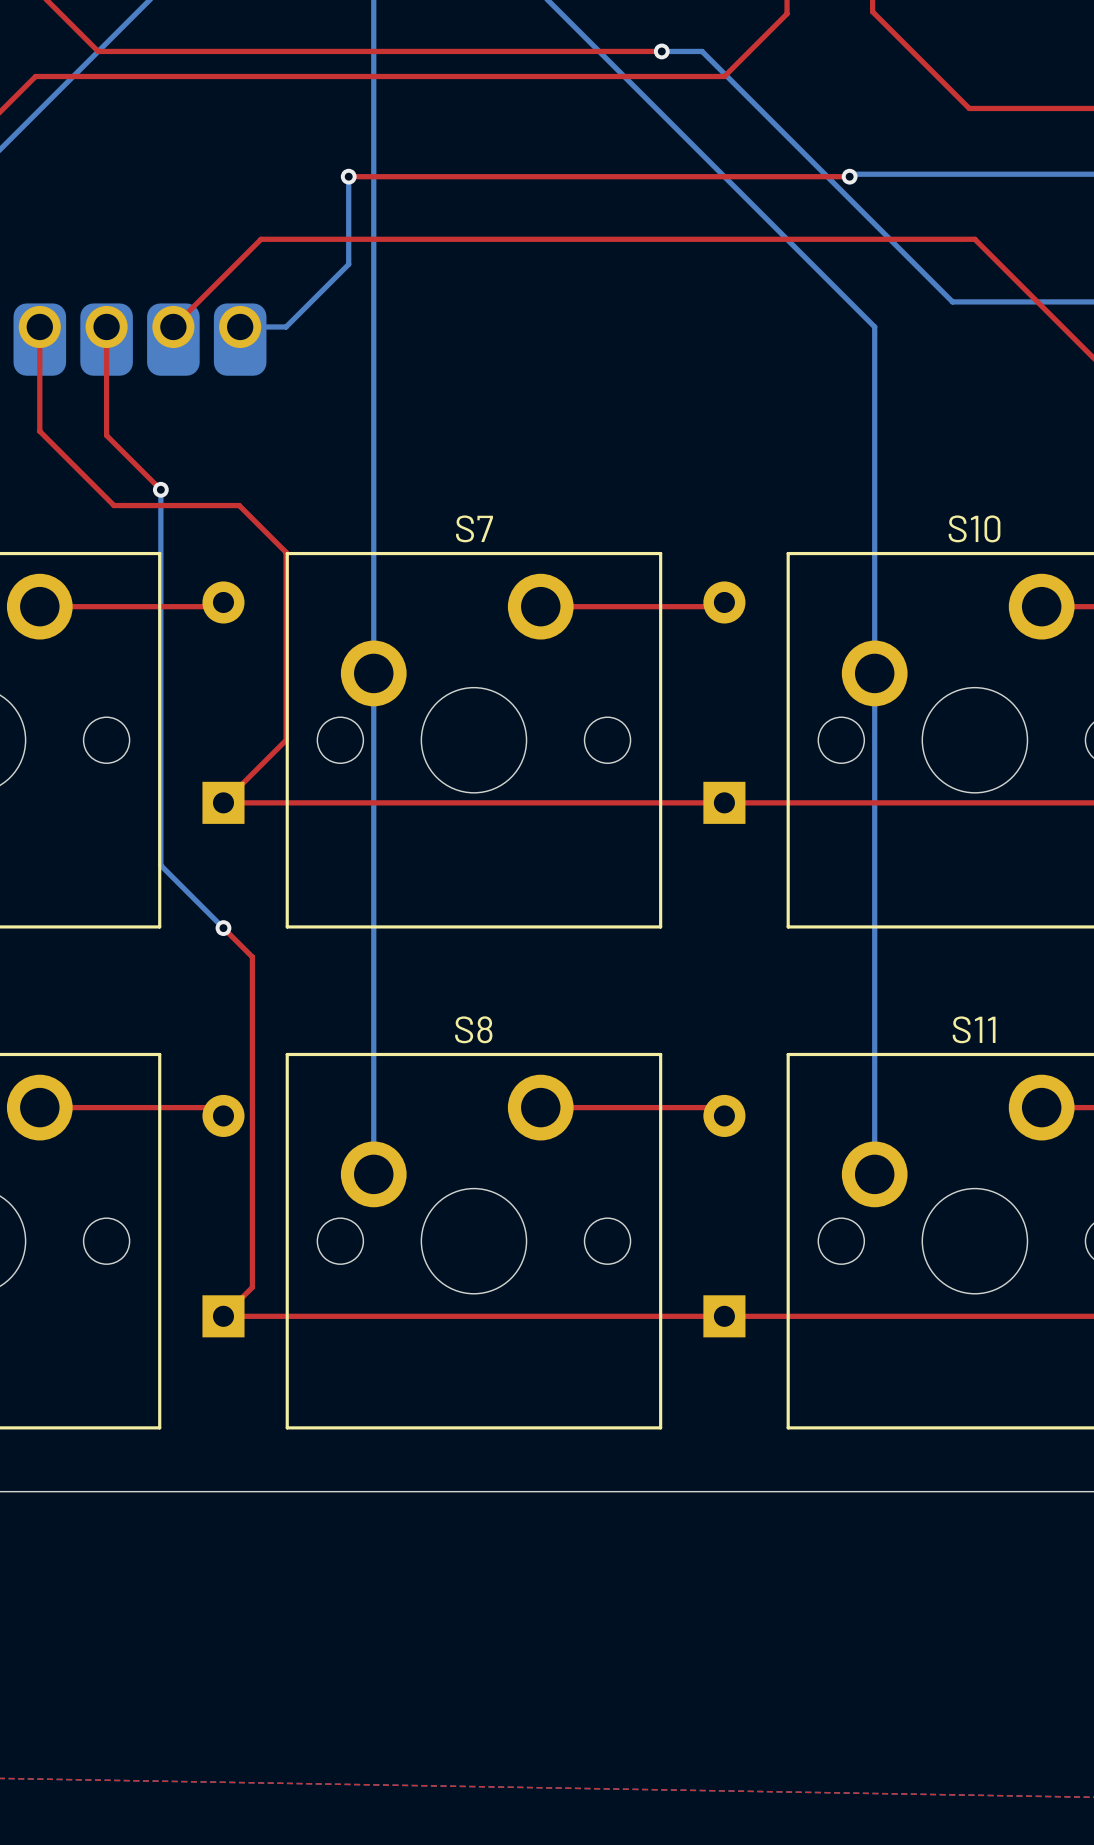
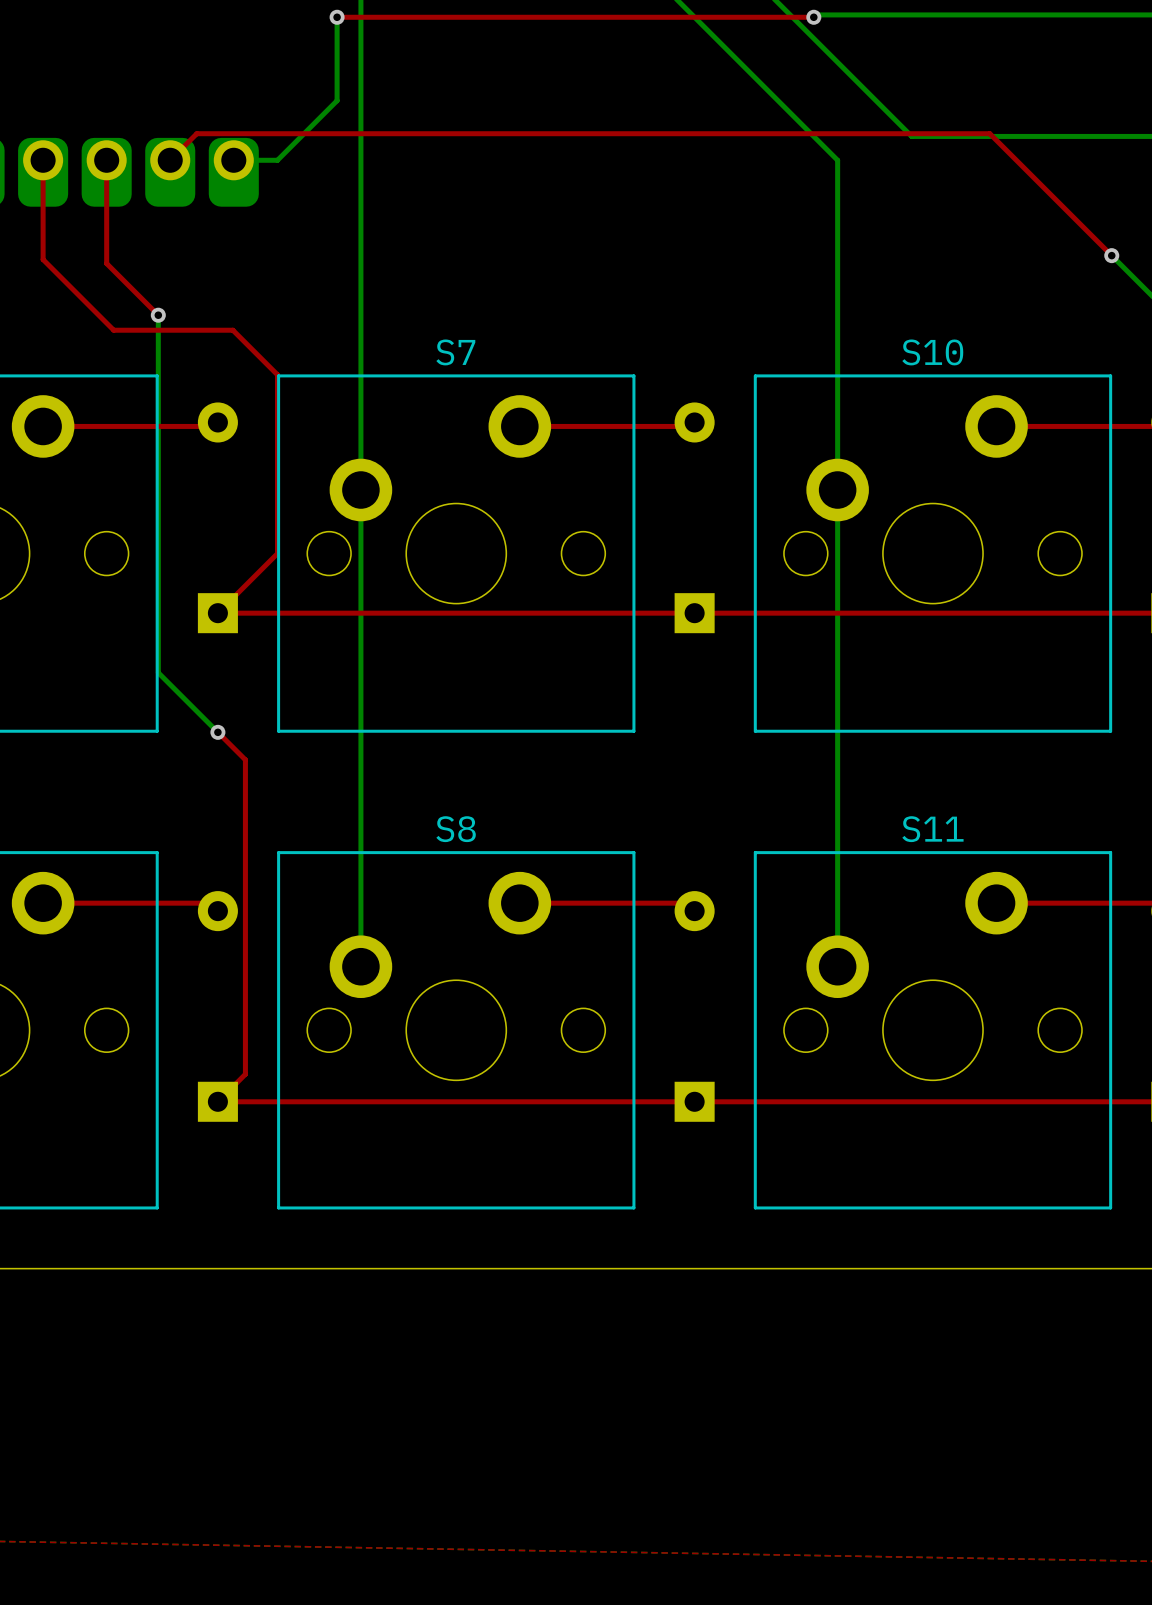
top track: (201, 299) (261, 239) (974, 239) (1034, 299) -> (196, 133) (989, 133)

